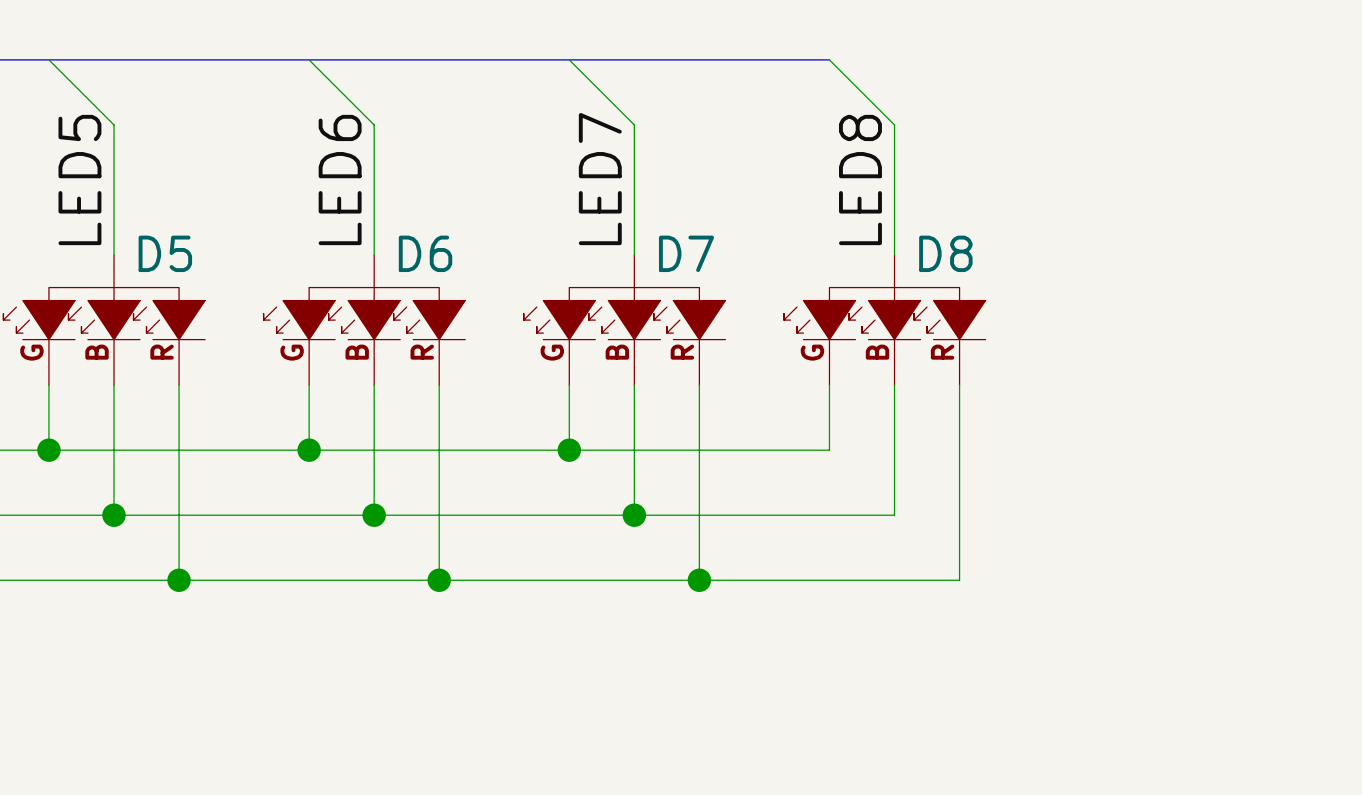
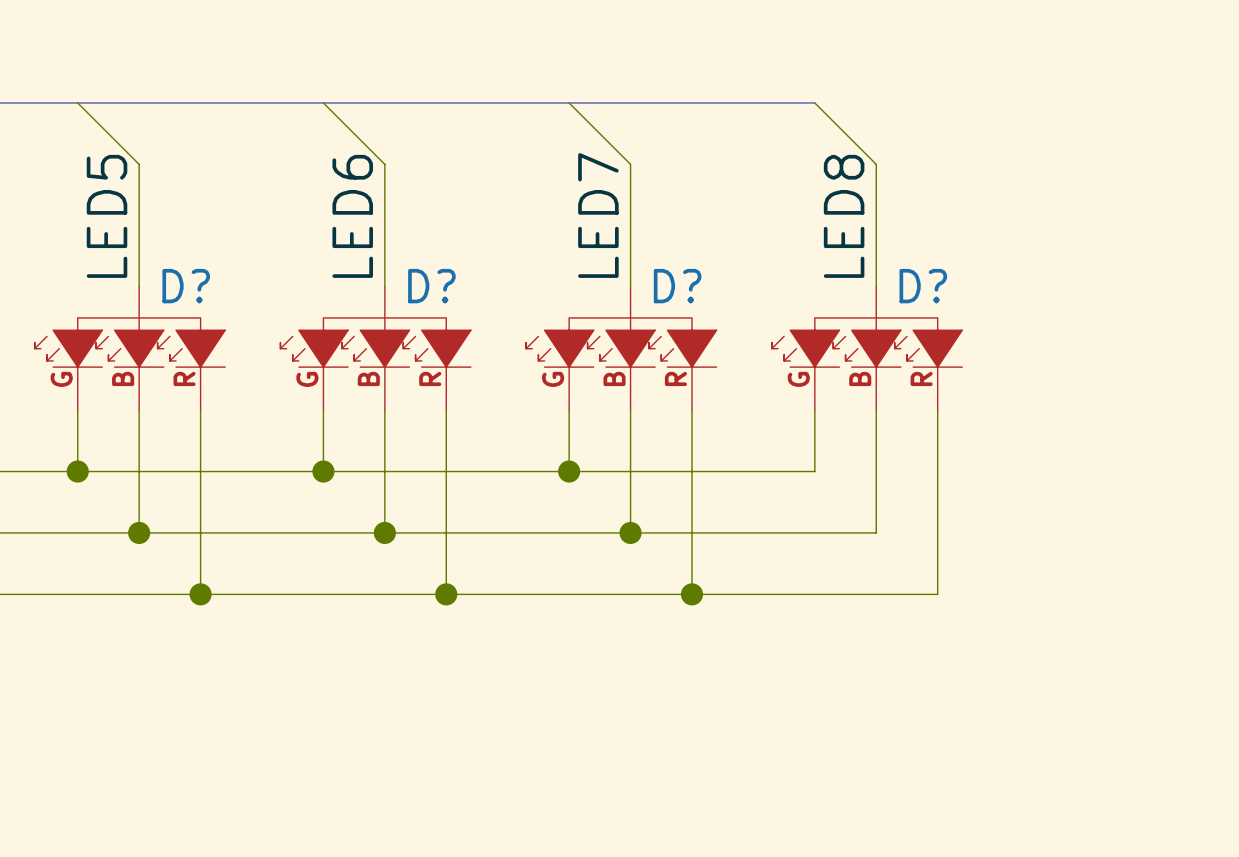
D5 name: D5 (165, 253) -> D? (186, 286)
D6 name: D6 (425, 253) -> D? (431, 286)
D7 name: D7 (686, 253) -> D? (677, 286)
D8 name: D8 (945, 253) -> D? (923, 286)

